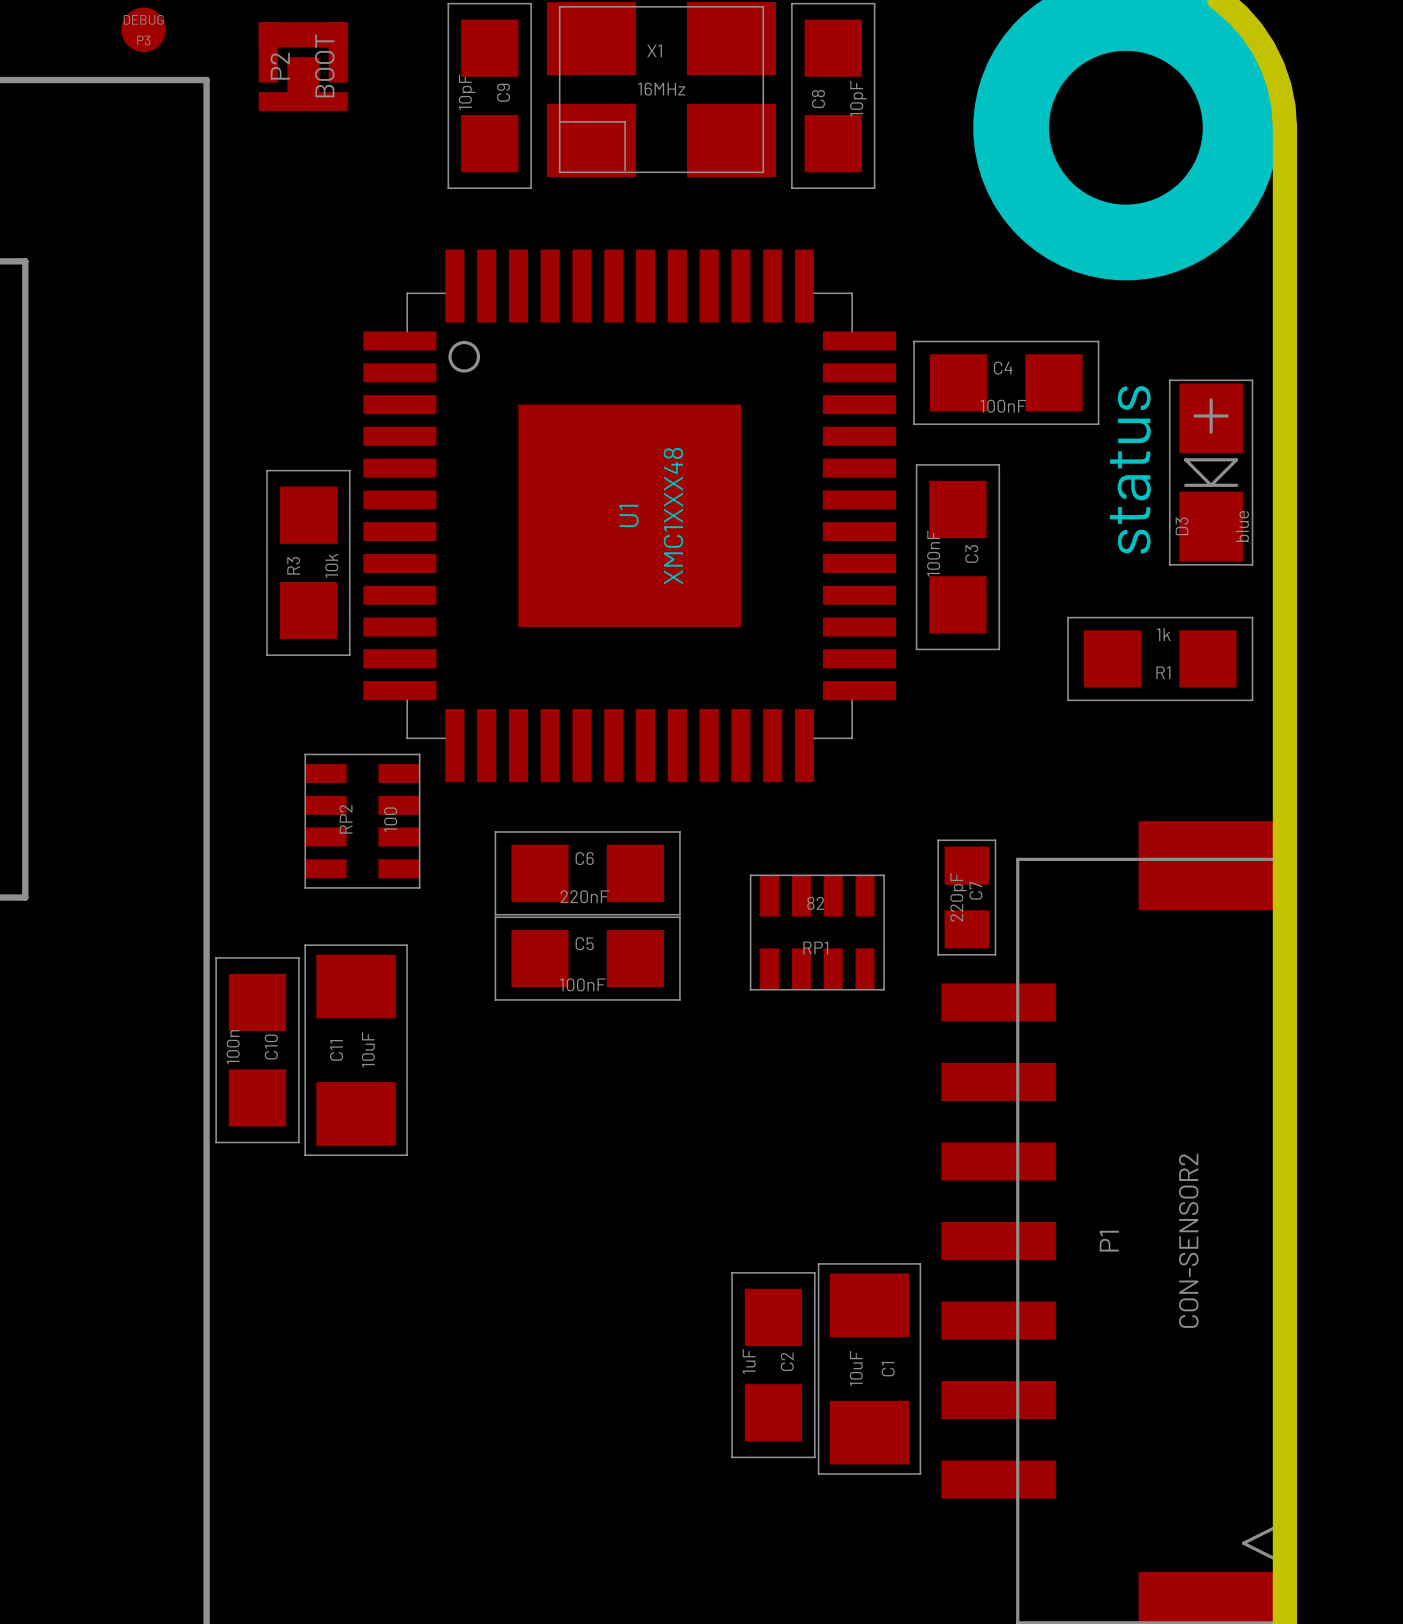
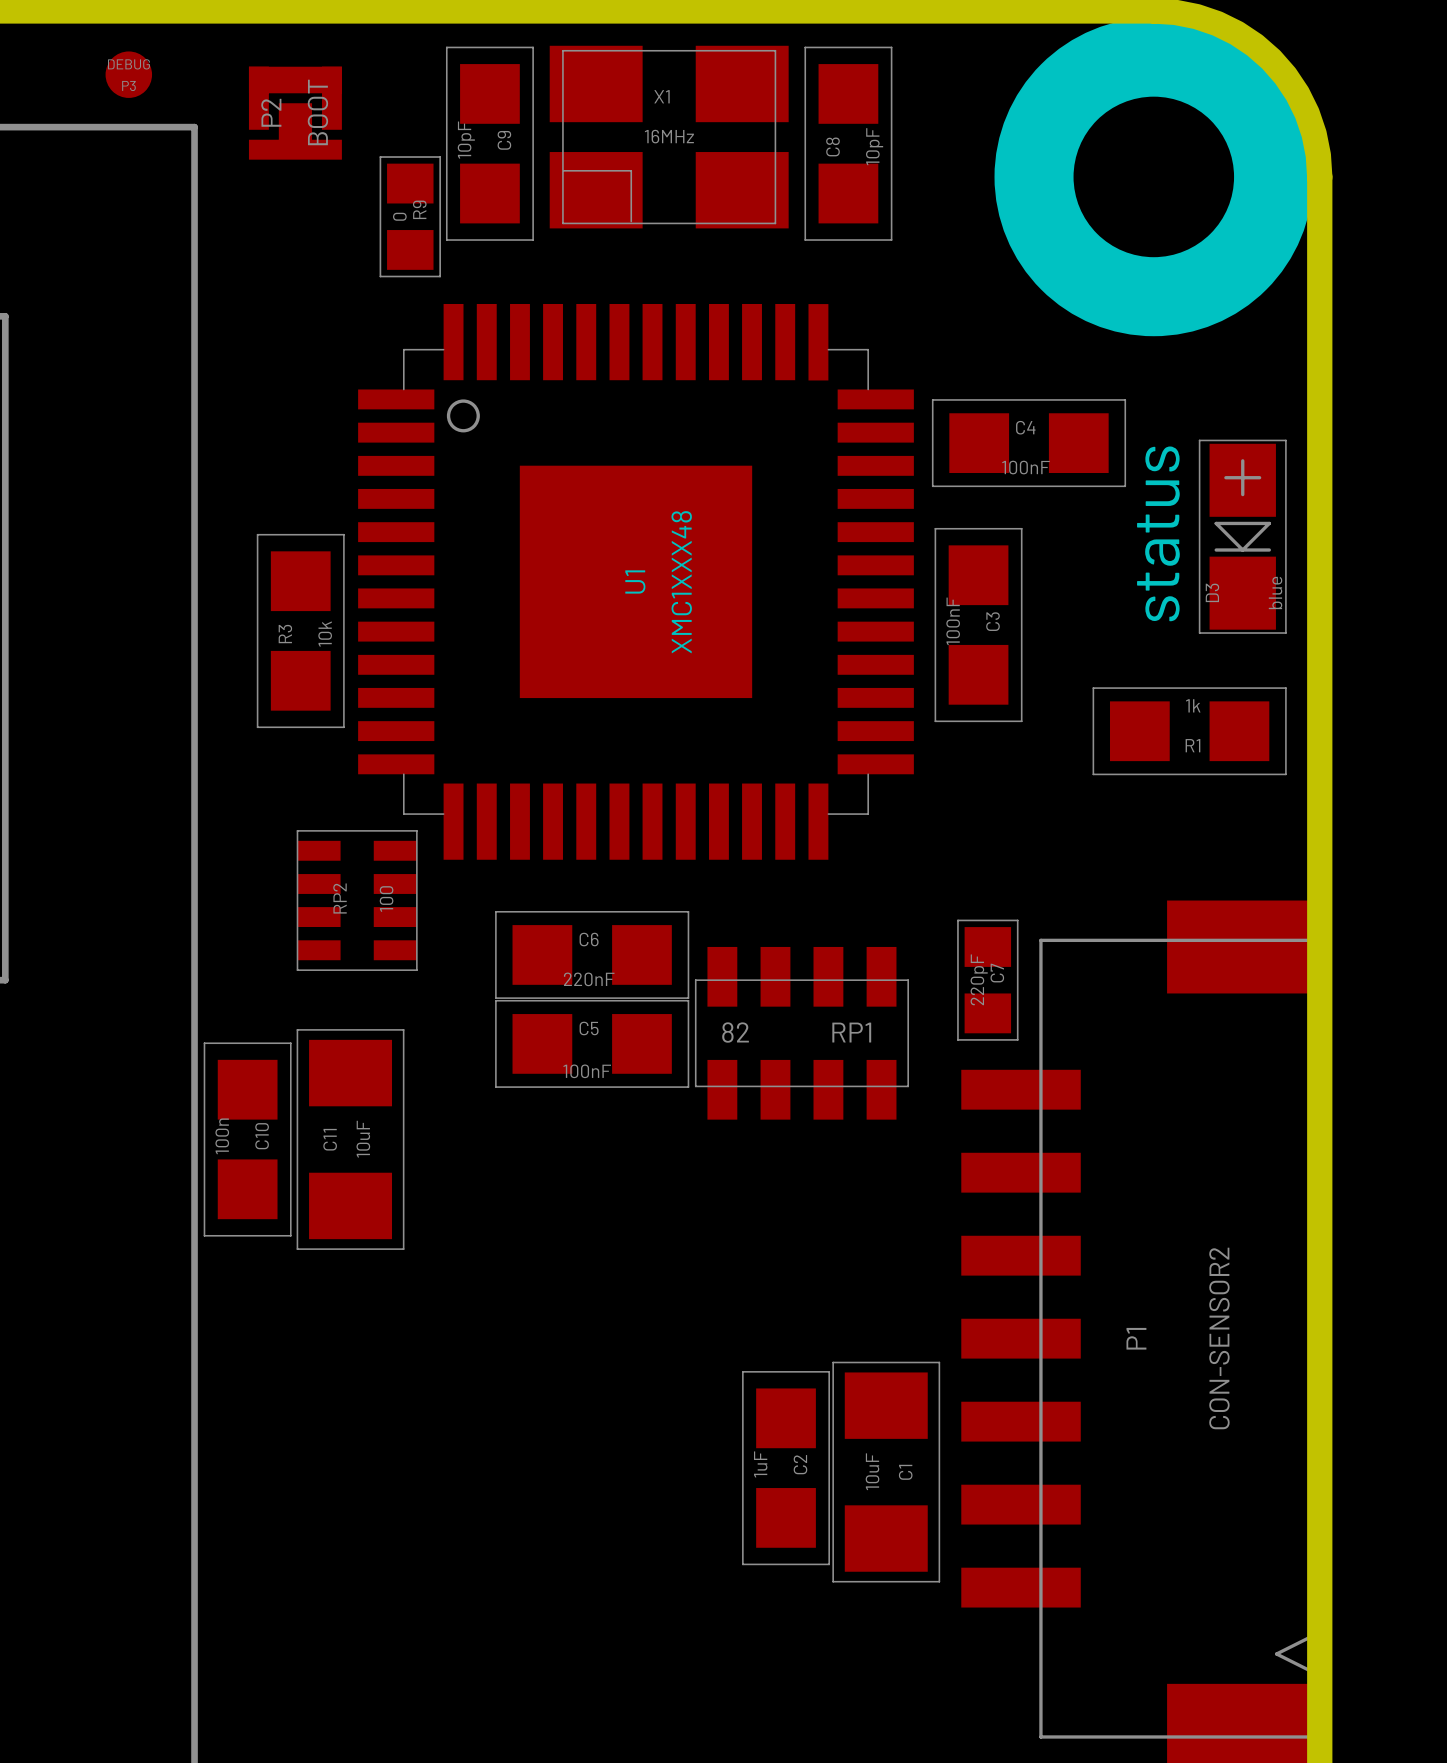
R9: none -> 0 (410, 216)
RP1 footprint: [750, 875, 885, 990] -> [695, 946, 909, 1120]

